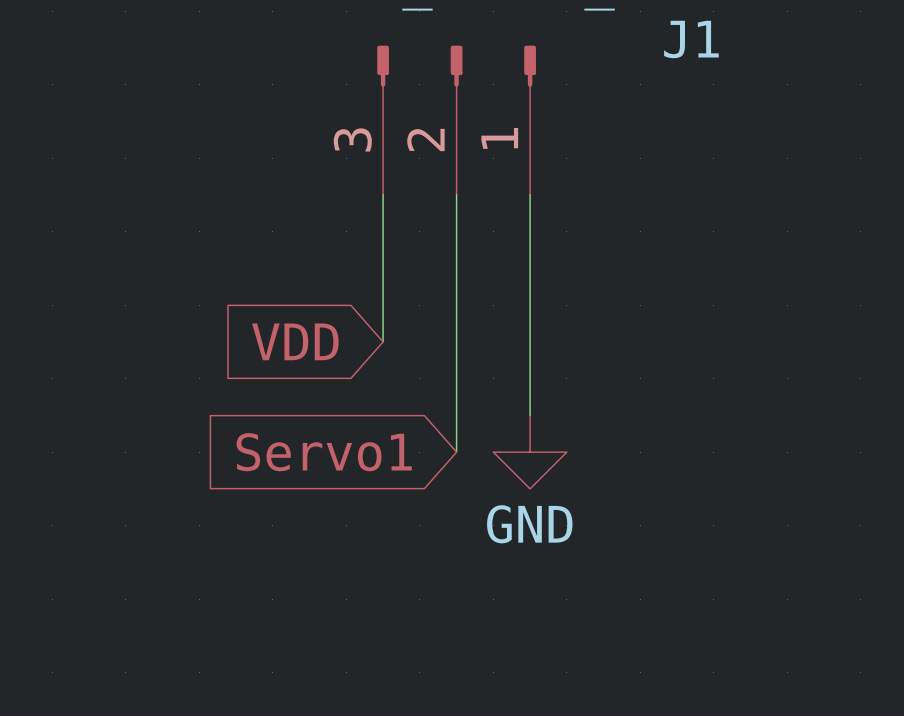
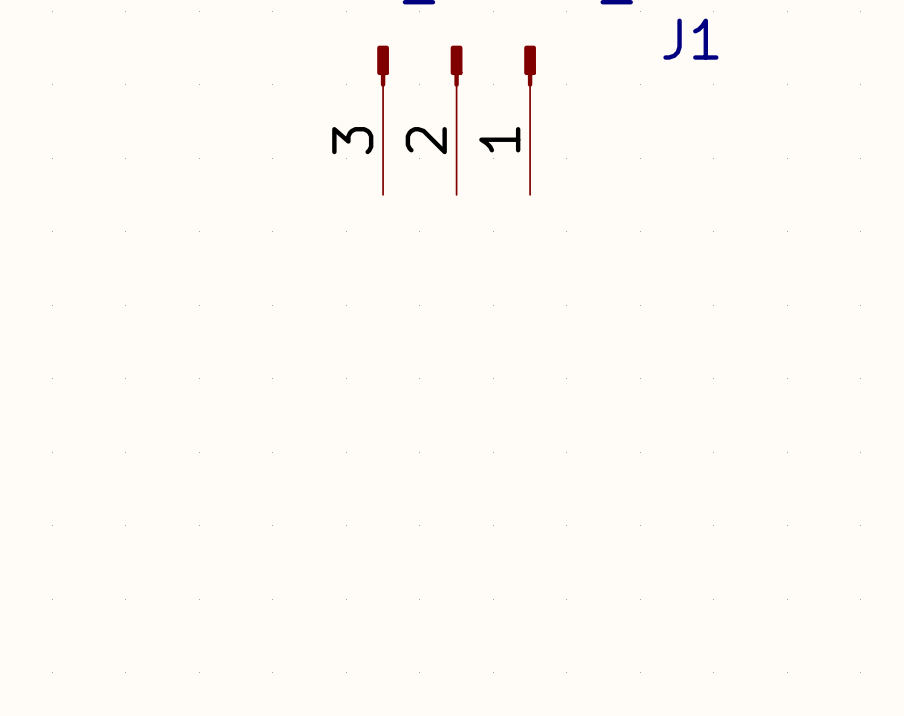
wire: (383, 194) (383, 341) -> none
wire: (456, 194) (456, 452) -> none
wire: (530, 194) (530, 415) -> none
global label: VDD (295, 341) -> none
global label: Servo1 (324, 452) -> none
power symbol: GND (530, 452) -> none

